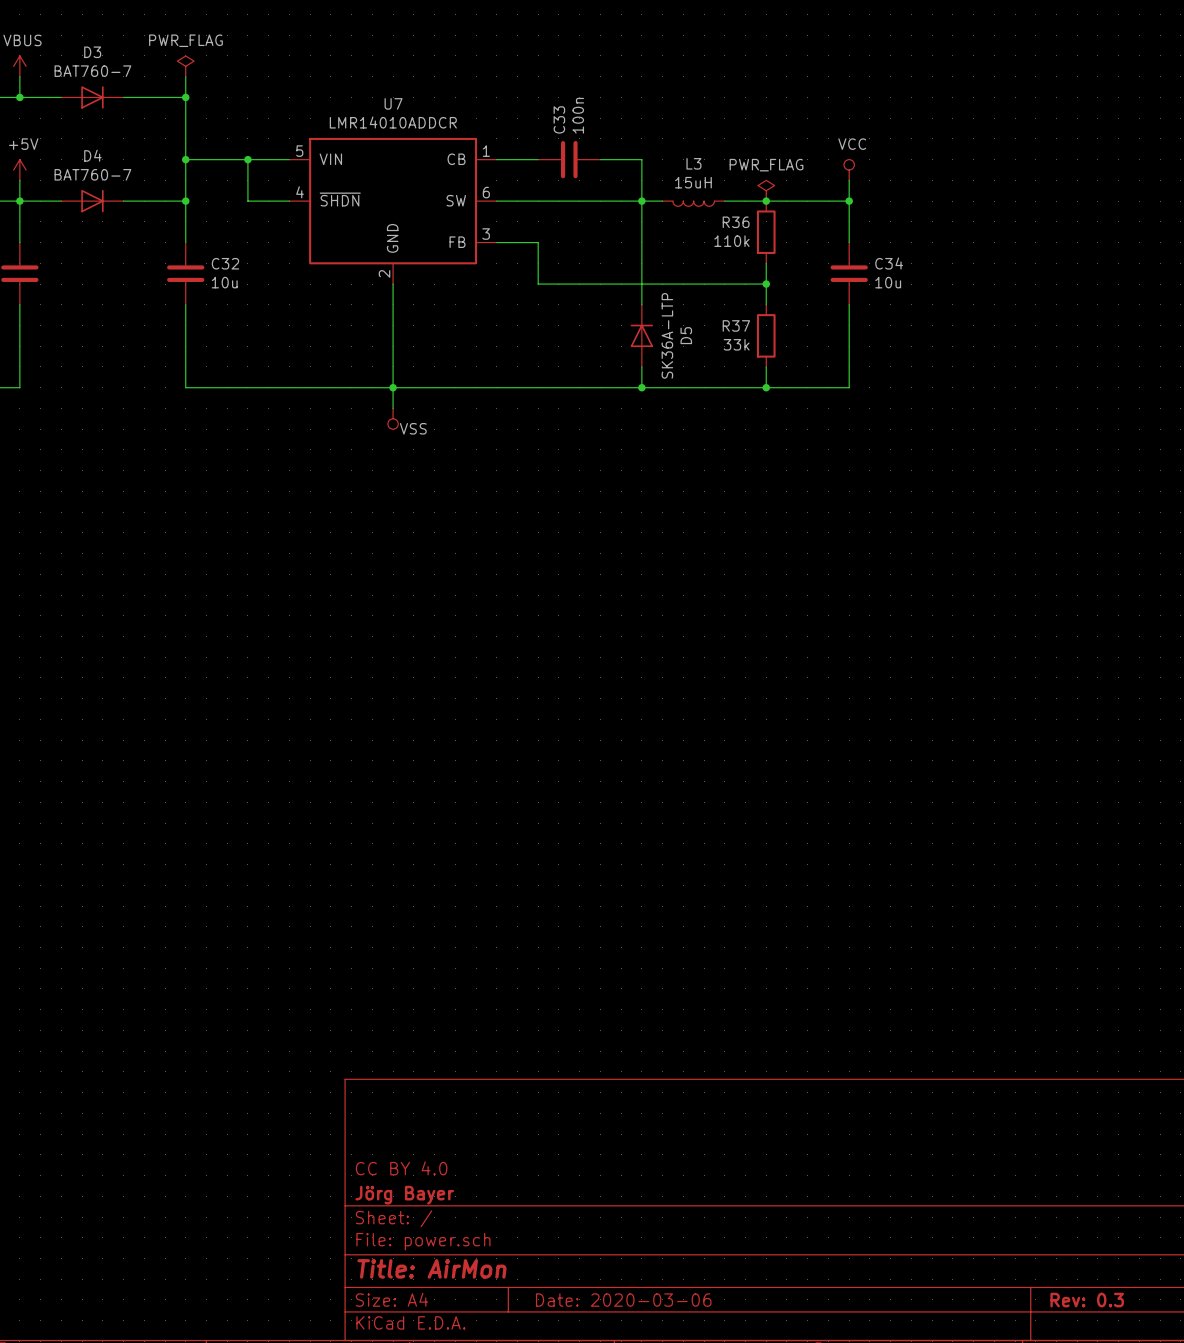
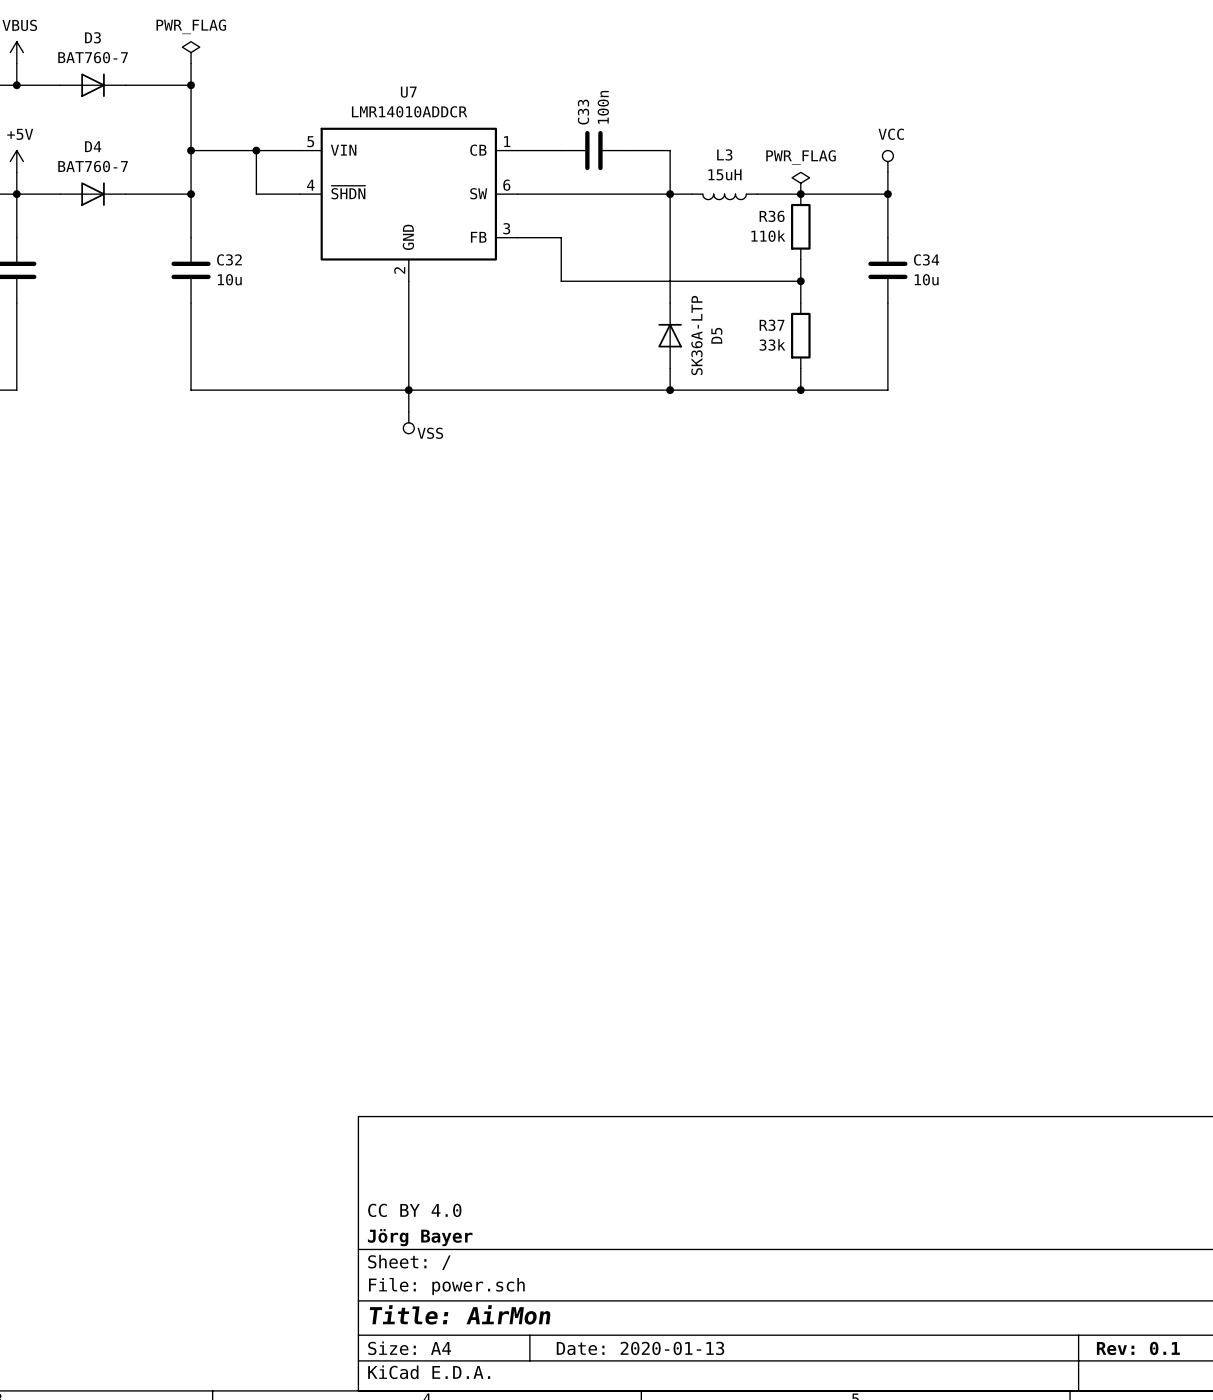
title block: Date: 2020-03-06 (623, 1300) -> Date: 2020-01-13 (640, 1348)
title block: Rev: 0.3 (1087, 1300) -> Rev: 0.1 (1138, 1348)

